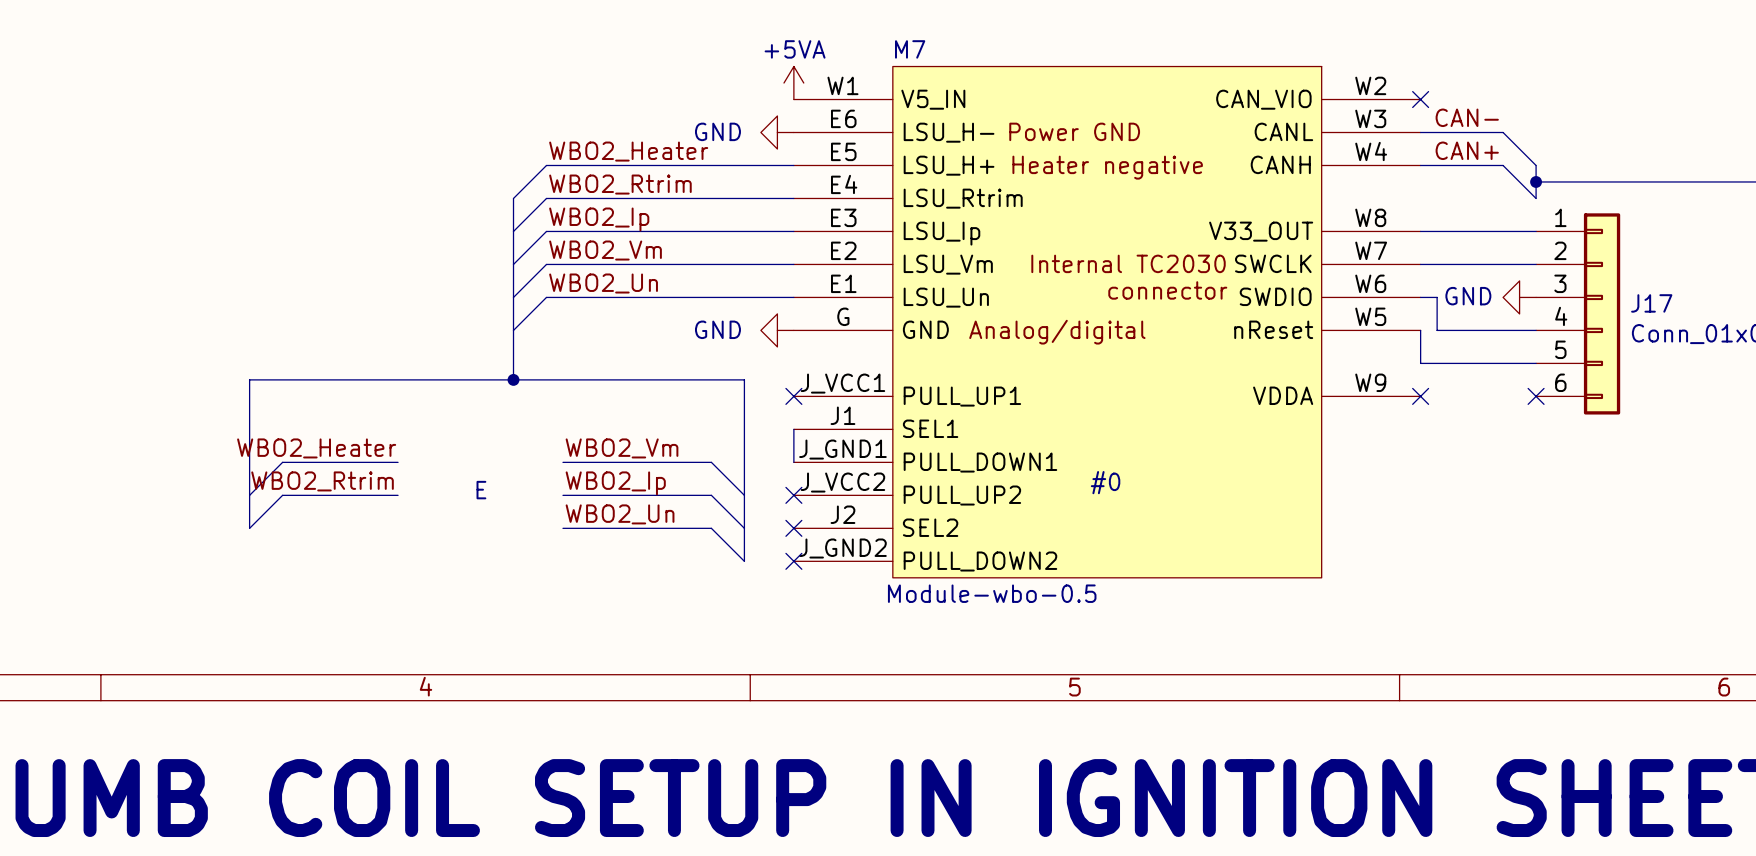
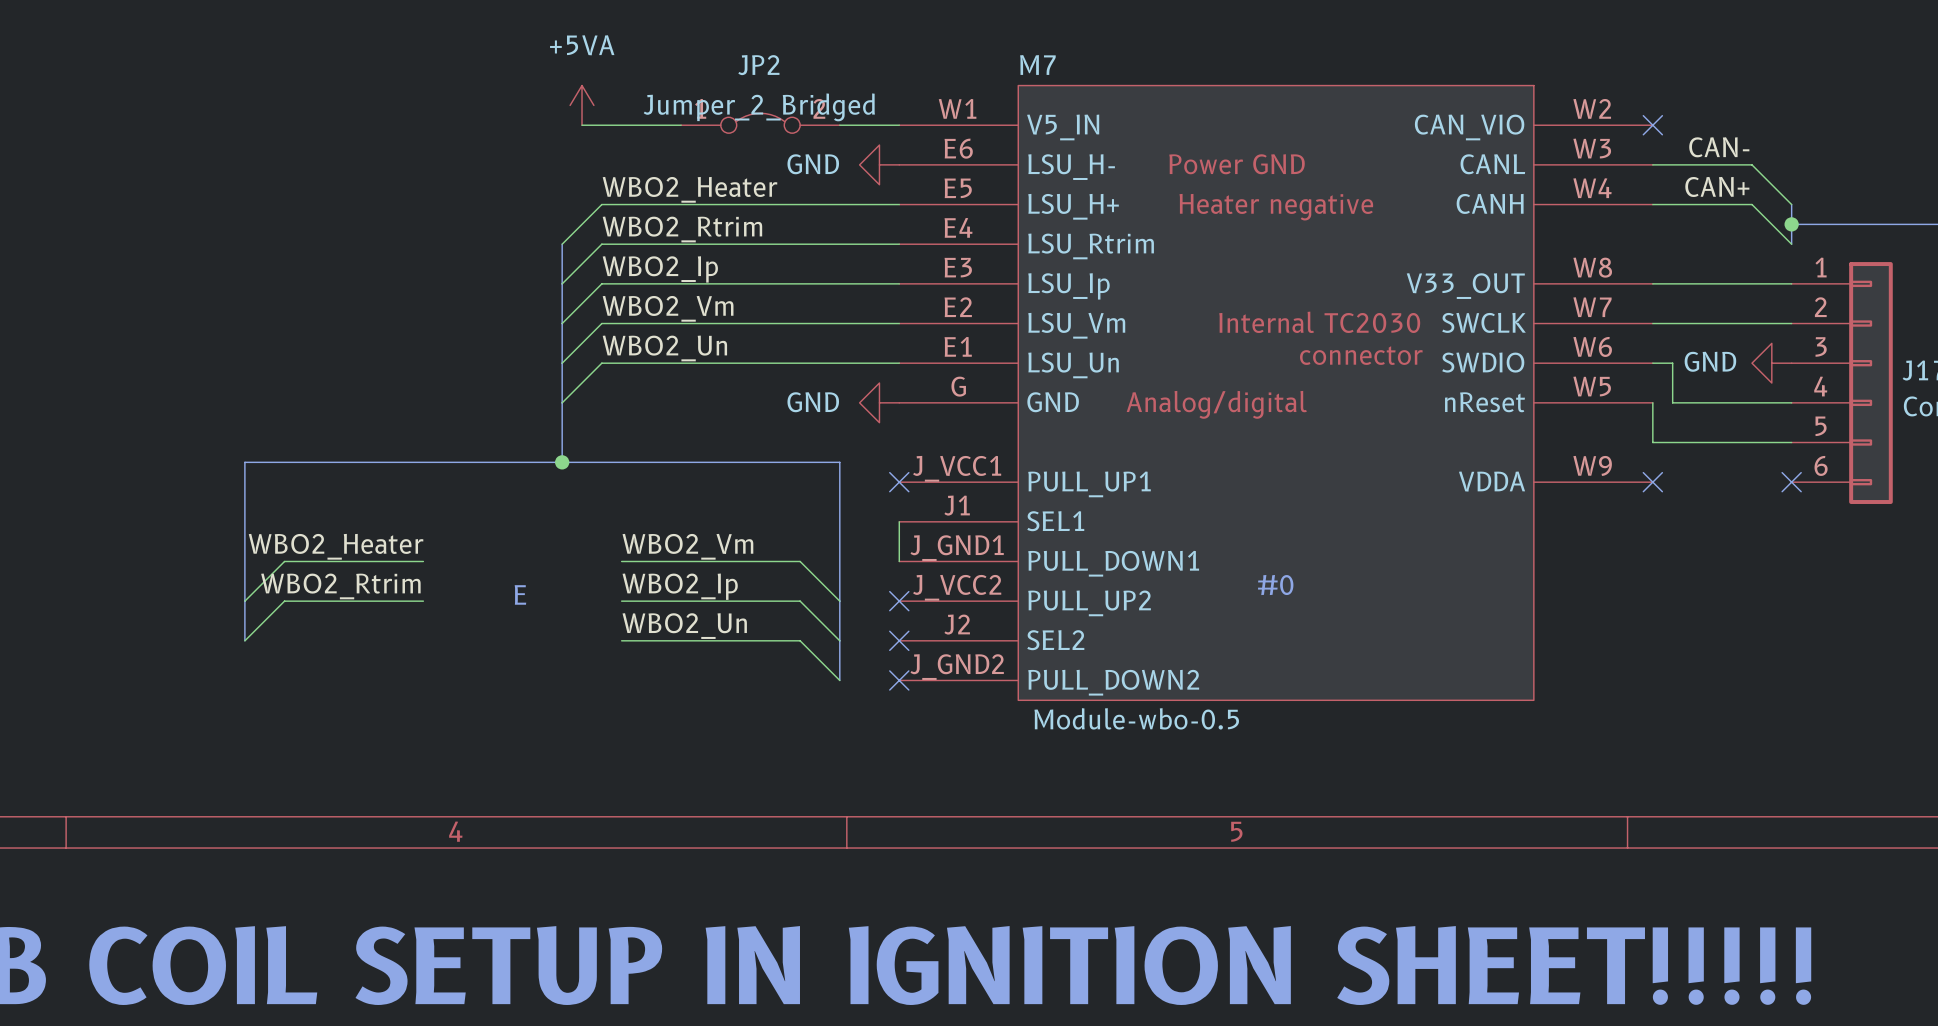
power symbol text position: +5VA (795, 49) -> +5VA (582, 45)
power symbol position: +5VA (793, 83) -> +5VA (582, 105)
JP2: none -> Jumper_2_Bridged (760, 123)
wire: none -> (582, 125) (681, 125)
wire: none -> (839, 125) (899, 125)

